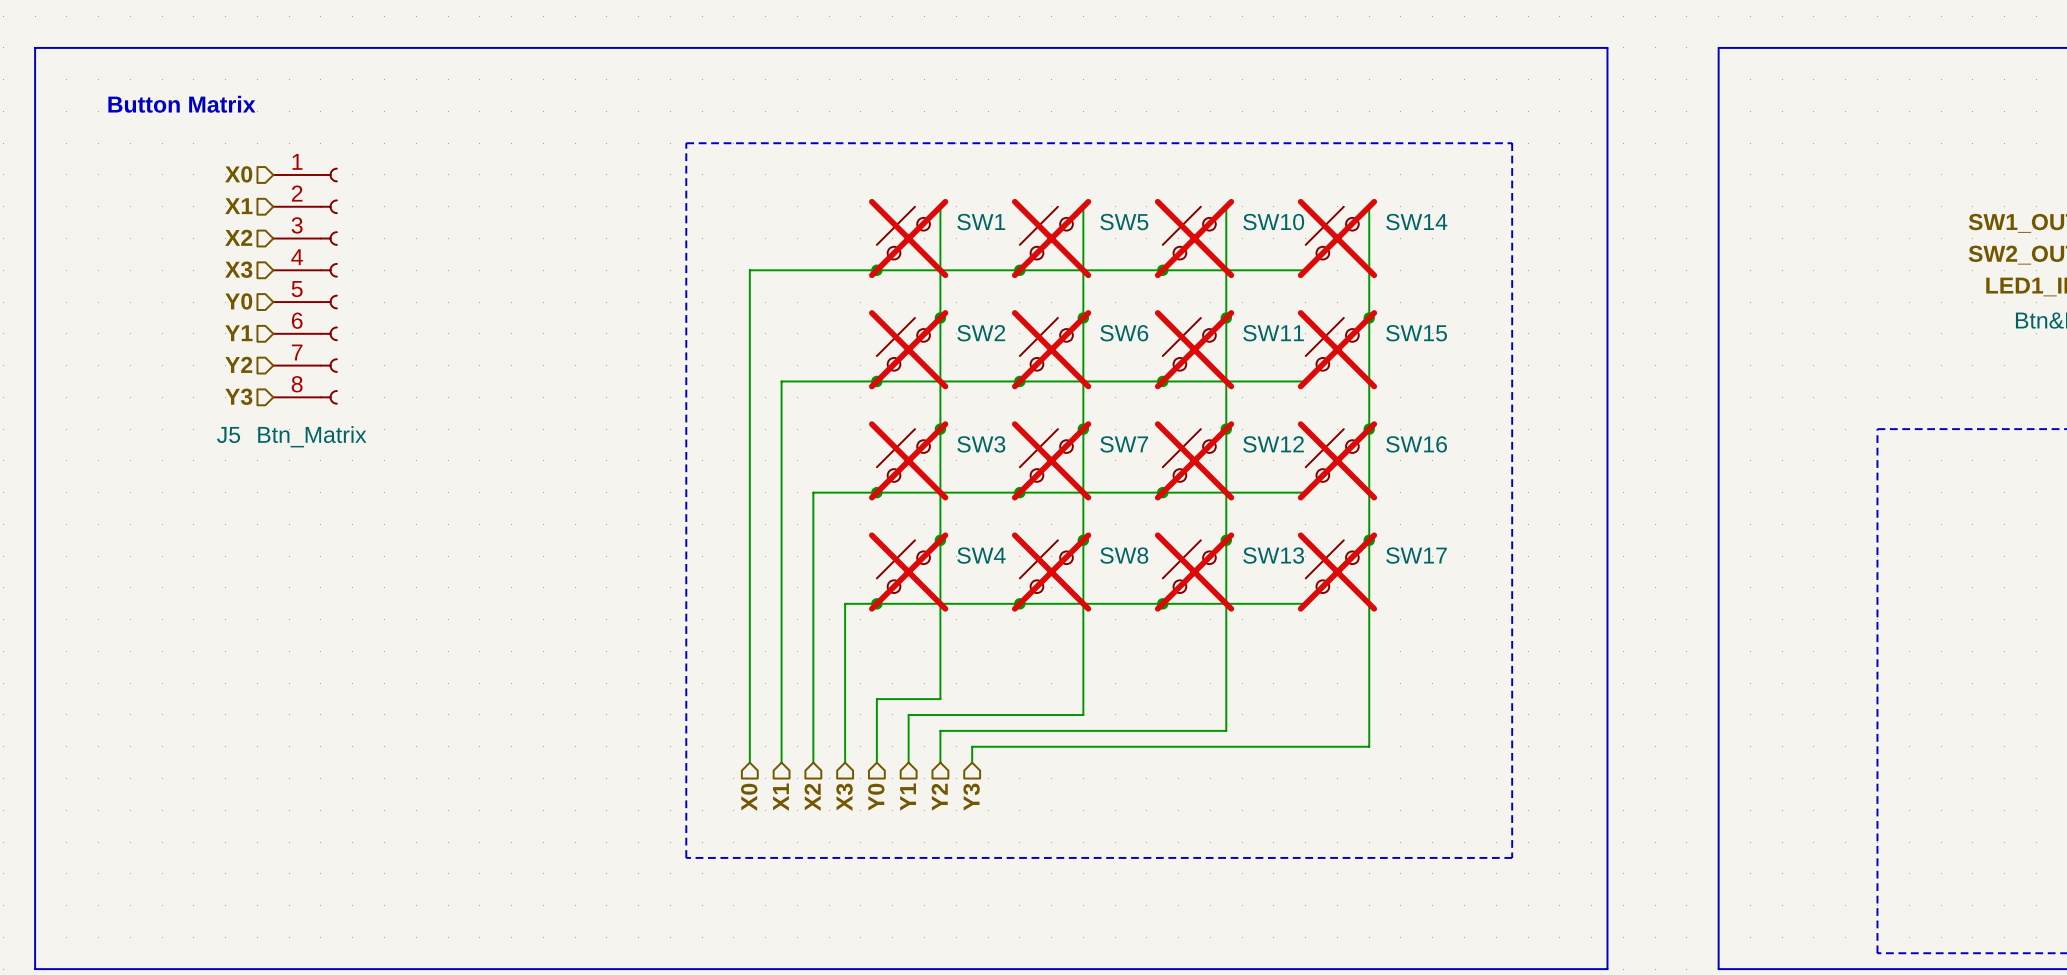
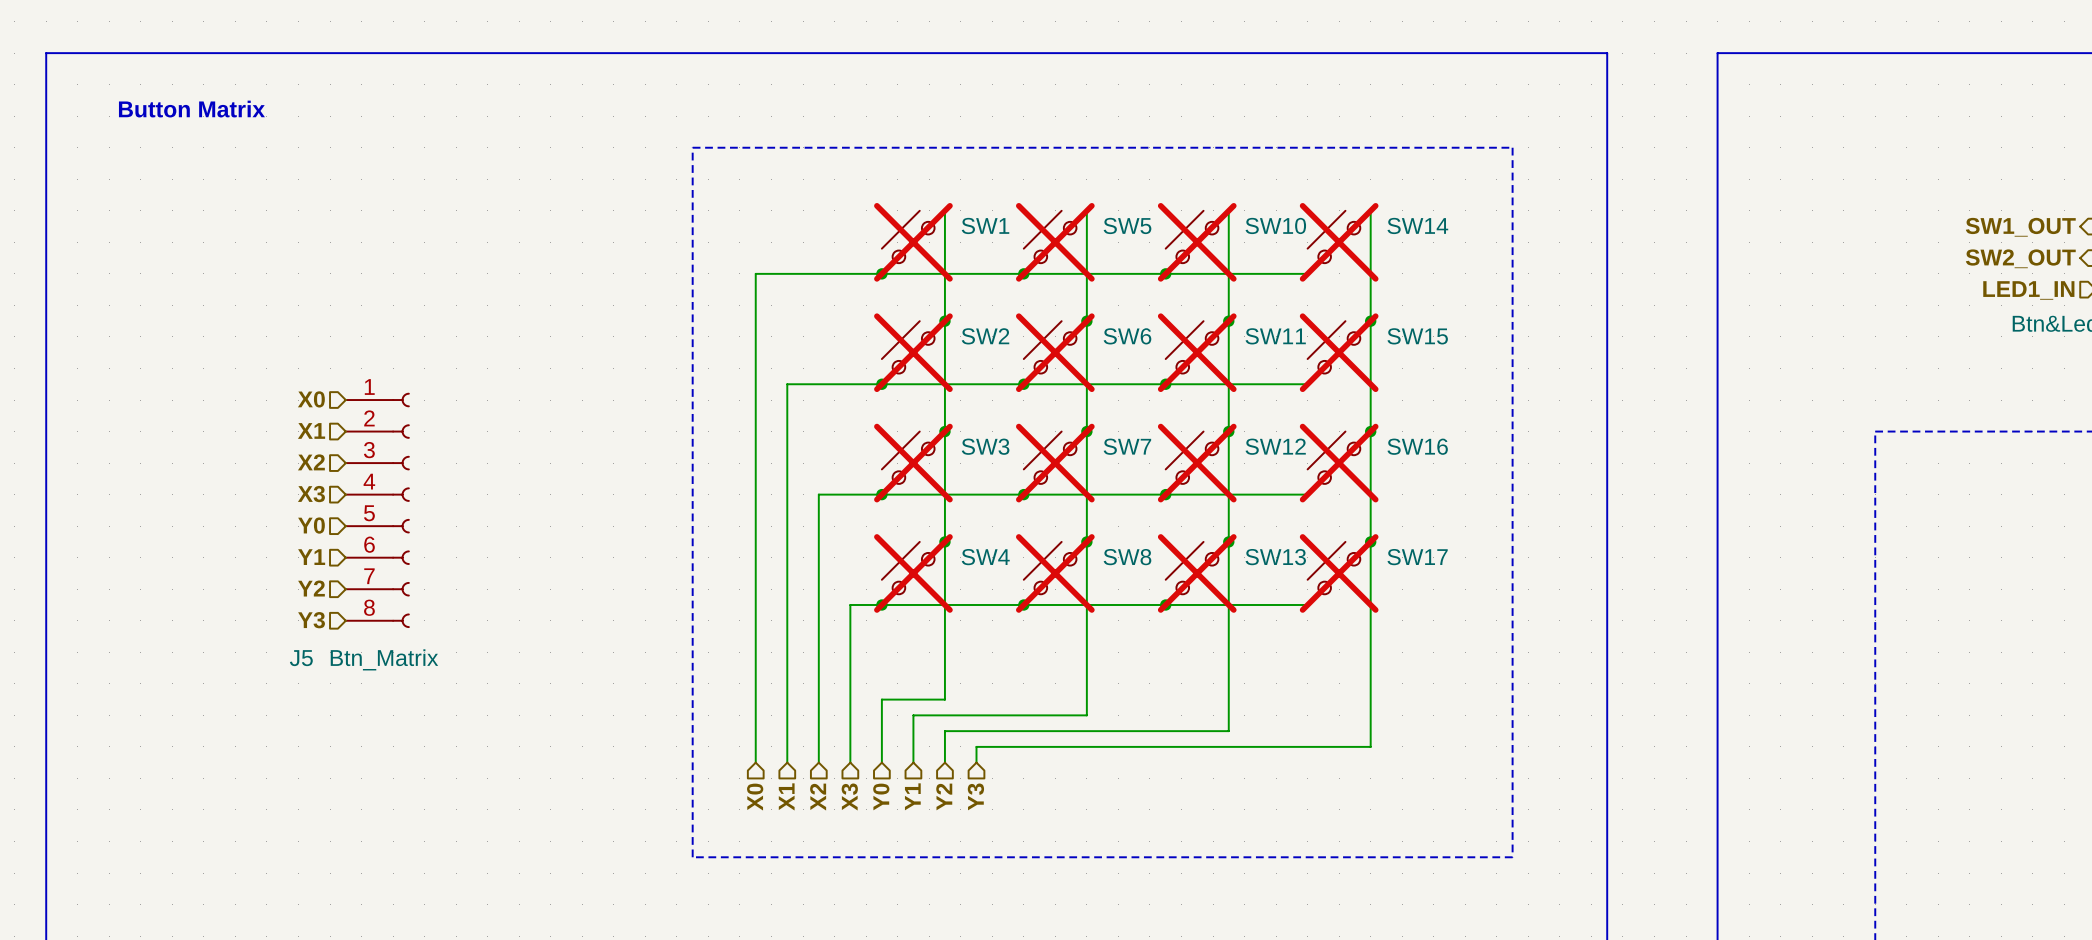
hierarchical label position: X0 (238, 174) -> X0 (311, 399)
hierarchical label position: X1 (238, 206) -> X1 (311, 430)
hierarchical label position: X2 (238, 237) -> X2 (311, 462)
hierarchical label position: X3 (238, 269) -> X3 (311, 494)
J5 position: (305, 286) -> (377, 510)
hierarchical label position: Y0 (238, 301) -> Y0 (311, 525)
hierarchical label position: Y1 (238, 333) -> Y1 (311, 557)
hierarchical label position: Y2 (238, 364) -> Y2 (311, 588)
hierarchical label position: Y3 (238, 396) -> Y3 (311, 620)

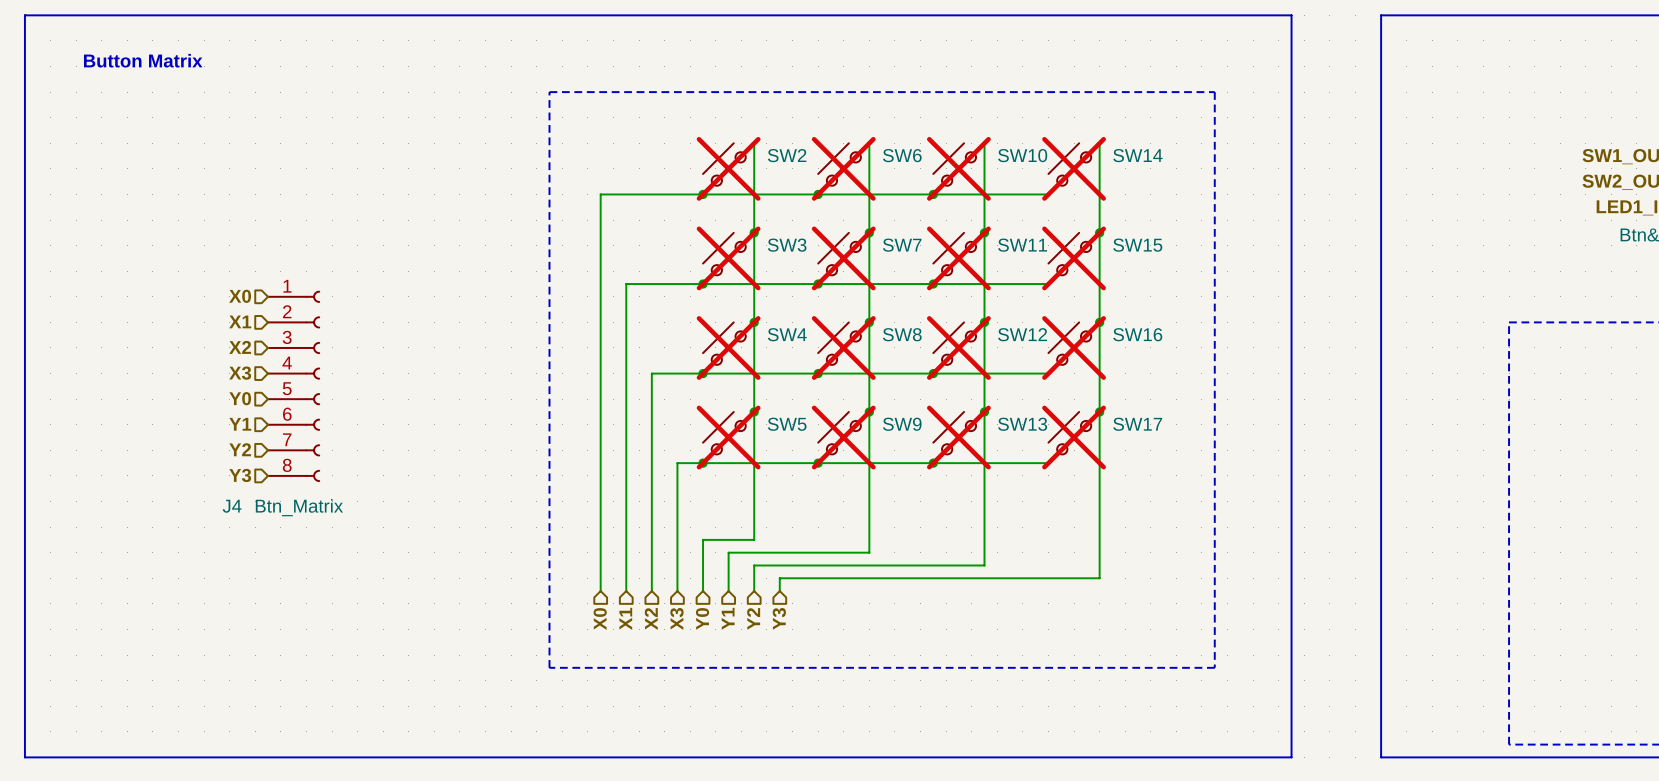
SW1 name: SW1 (985, 225) -> SW2 (787, 155)
SW5 name: SW5 (1127, 225) -> SW6 (902, 155)
SW2 name: SW2 (985, 336) -> SW3 (787, 245)
SW6 name: SW6 (1127, 336) -> SW7 (902, 245)
SW3 name: SW3 (985, 446) -> SW4 (787, 334)
SW7 name: SW7 (1127, 446) -> SW8 (902, 334)
SW4 name: SW4 (985, 557) -> SW5 (787, 424)
SW8 name: SW8 (1127, 557) -> SW9 (902, 424)
J5 name: J5 (301, 658) -> J4 (232, 506)

